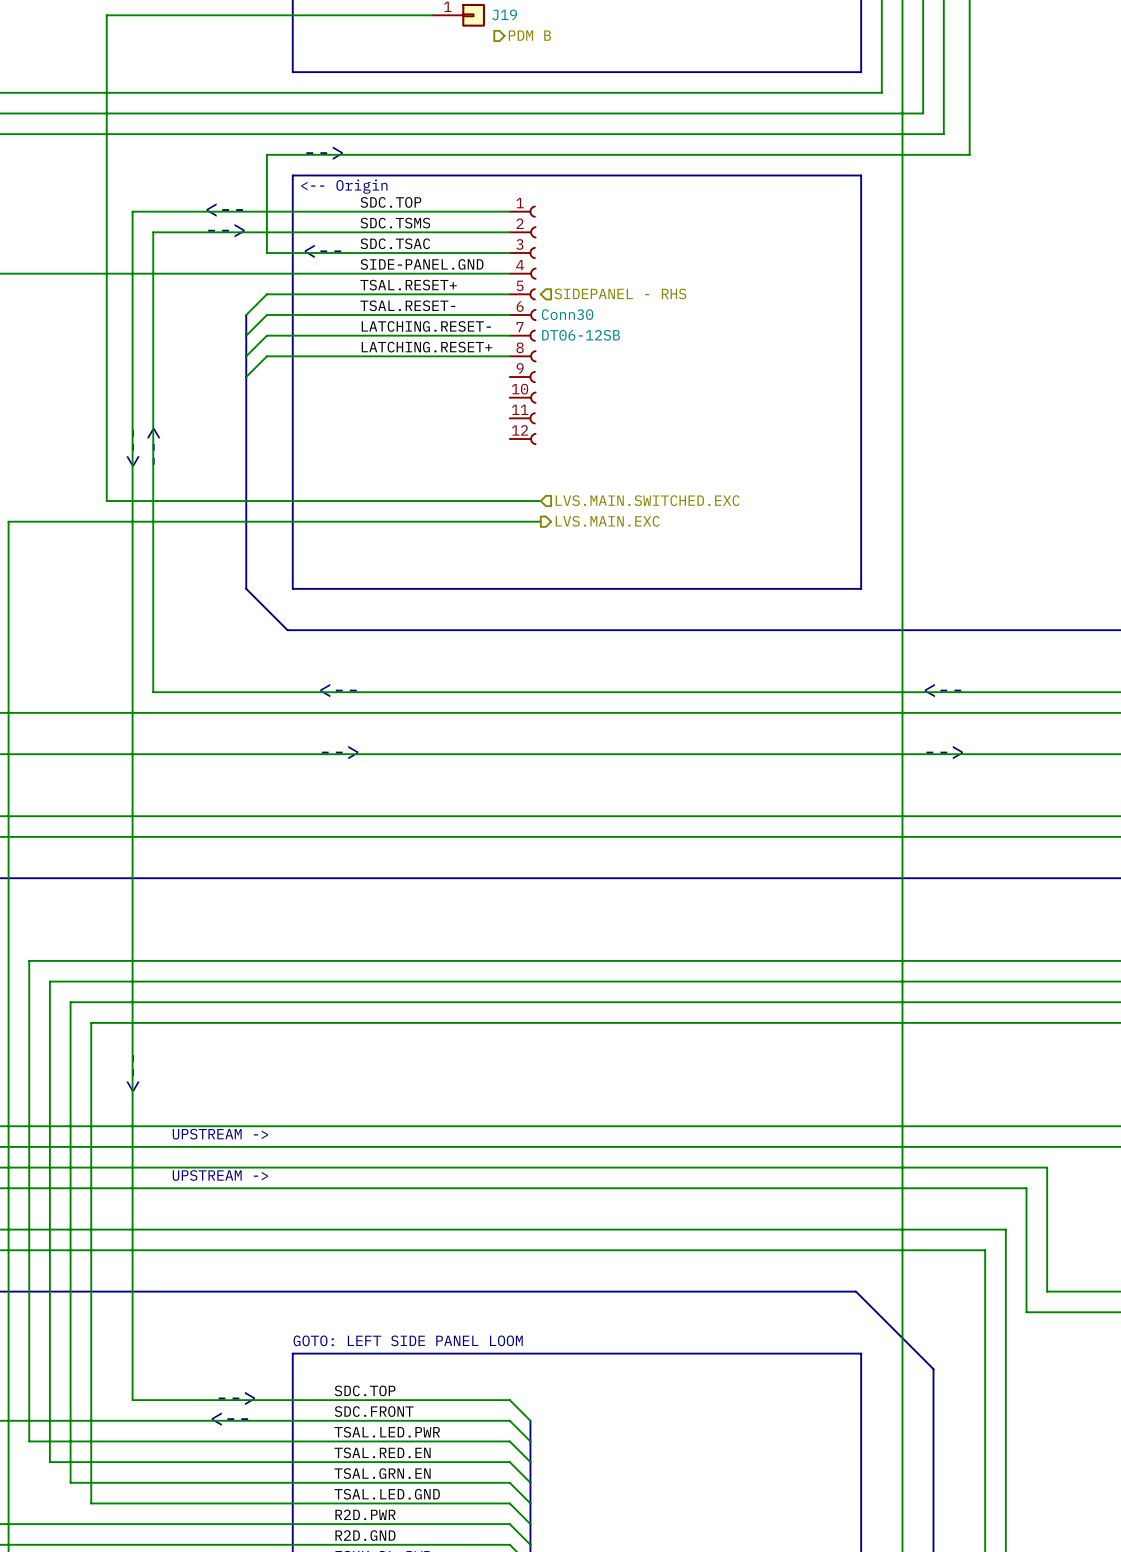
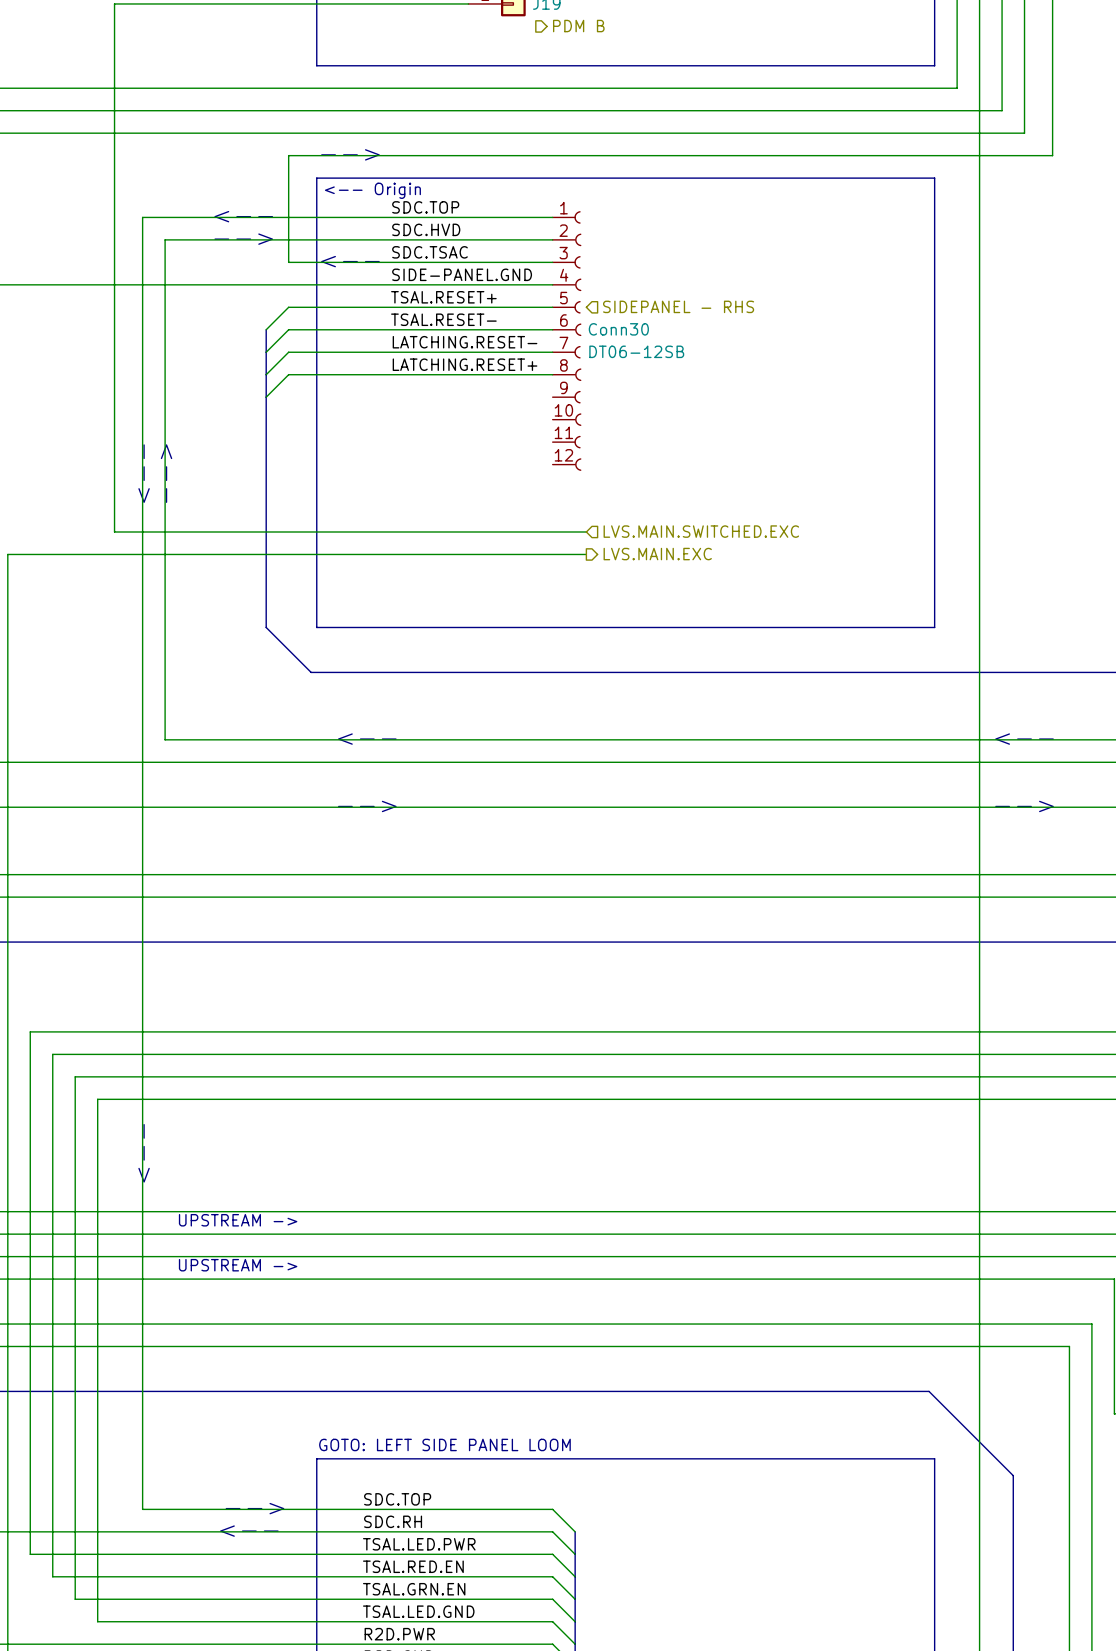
label: SDC.TSMS (395, 223) -> SDC.HVD (426, 229)
label: SDC.FRONT (374, 1411) -> SDC.RH (393, 1521)

